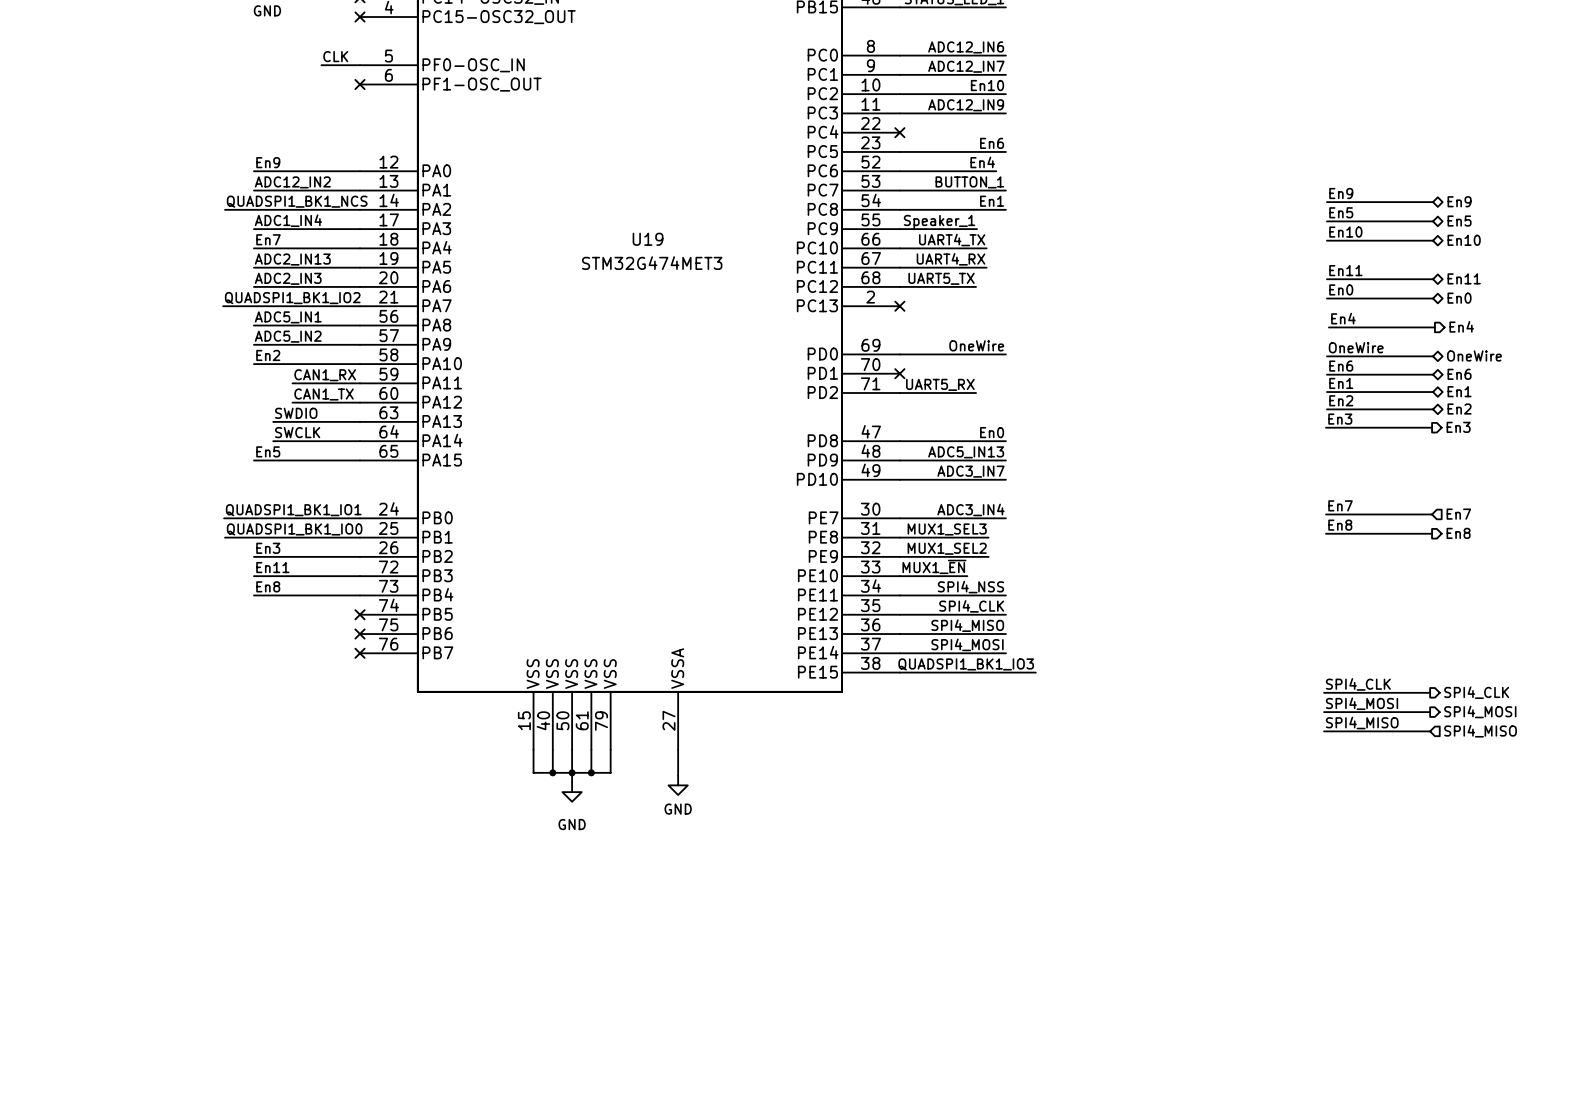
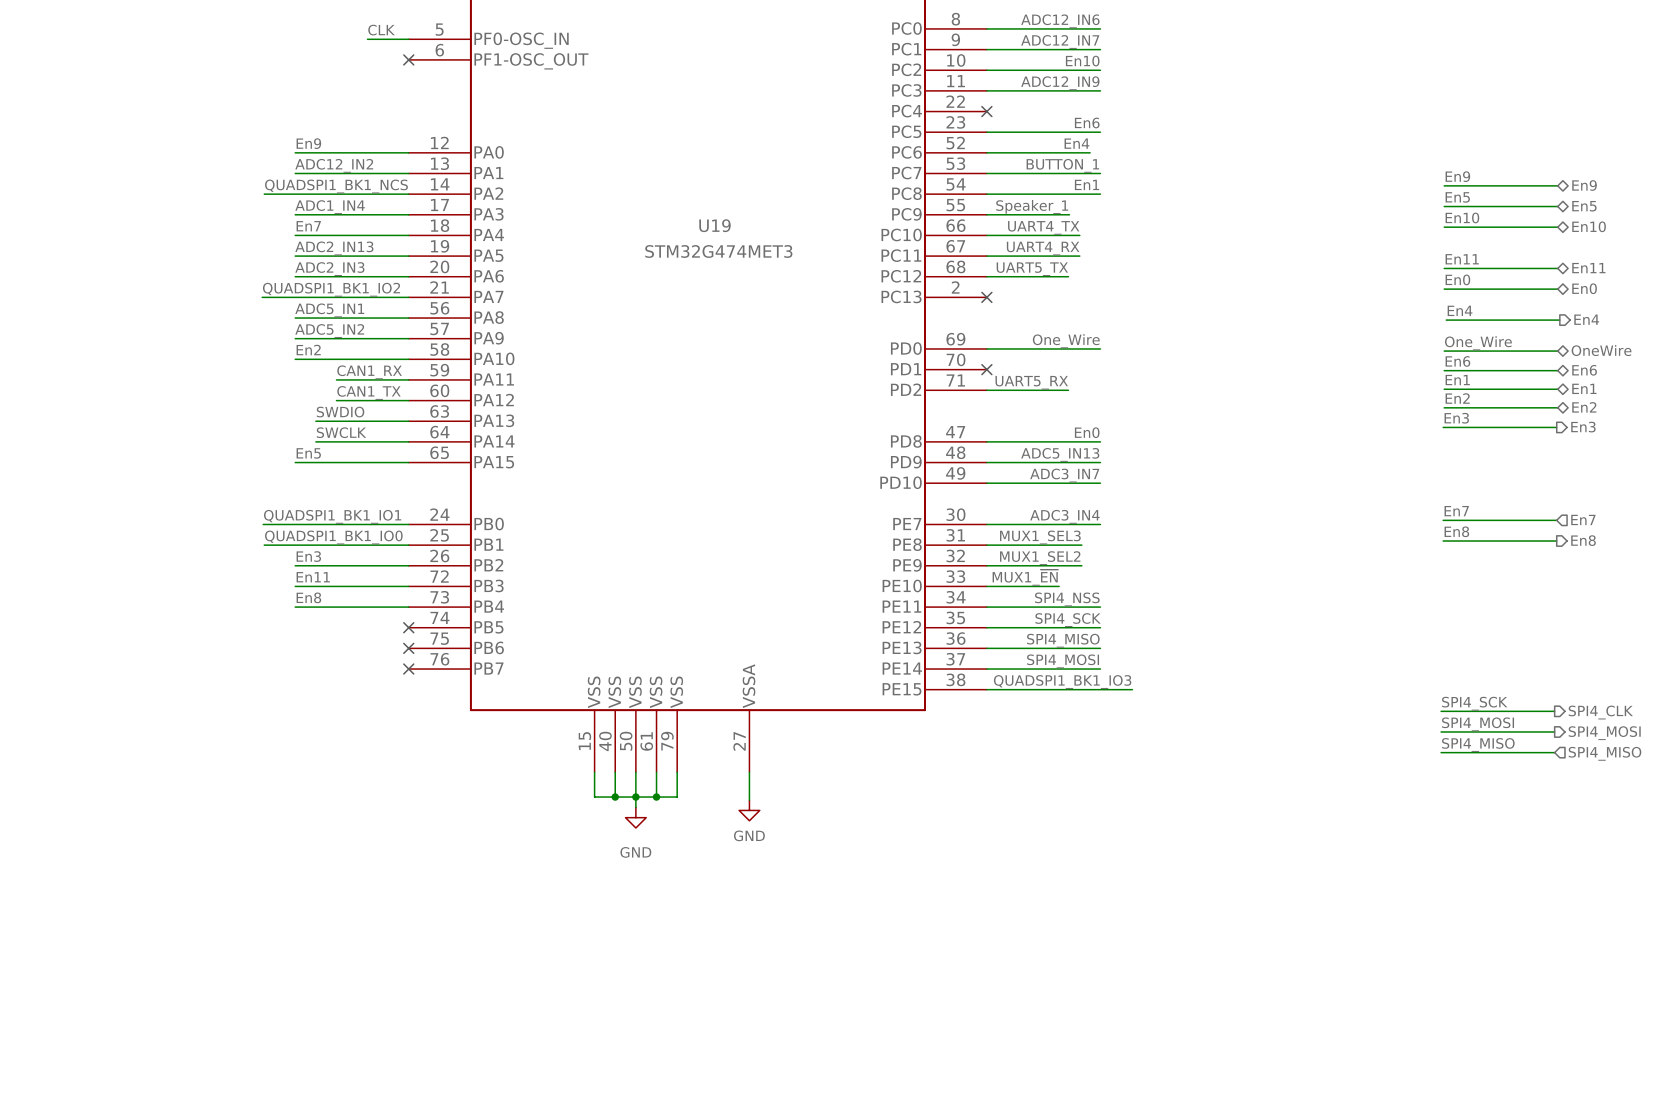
label: OneWire (976, 345) -> One_Wire (1066, 341)
label: OneWire (1356, 347) -> One_Wire (1478, 343)
label: SPI4_CLK (971, 606) -> SPI4_SCK (1068, 620)
label: SPI4_CLK (1358, 684) -> SPI4_SCK (1474, 703)

